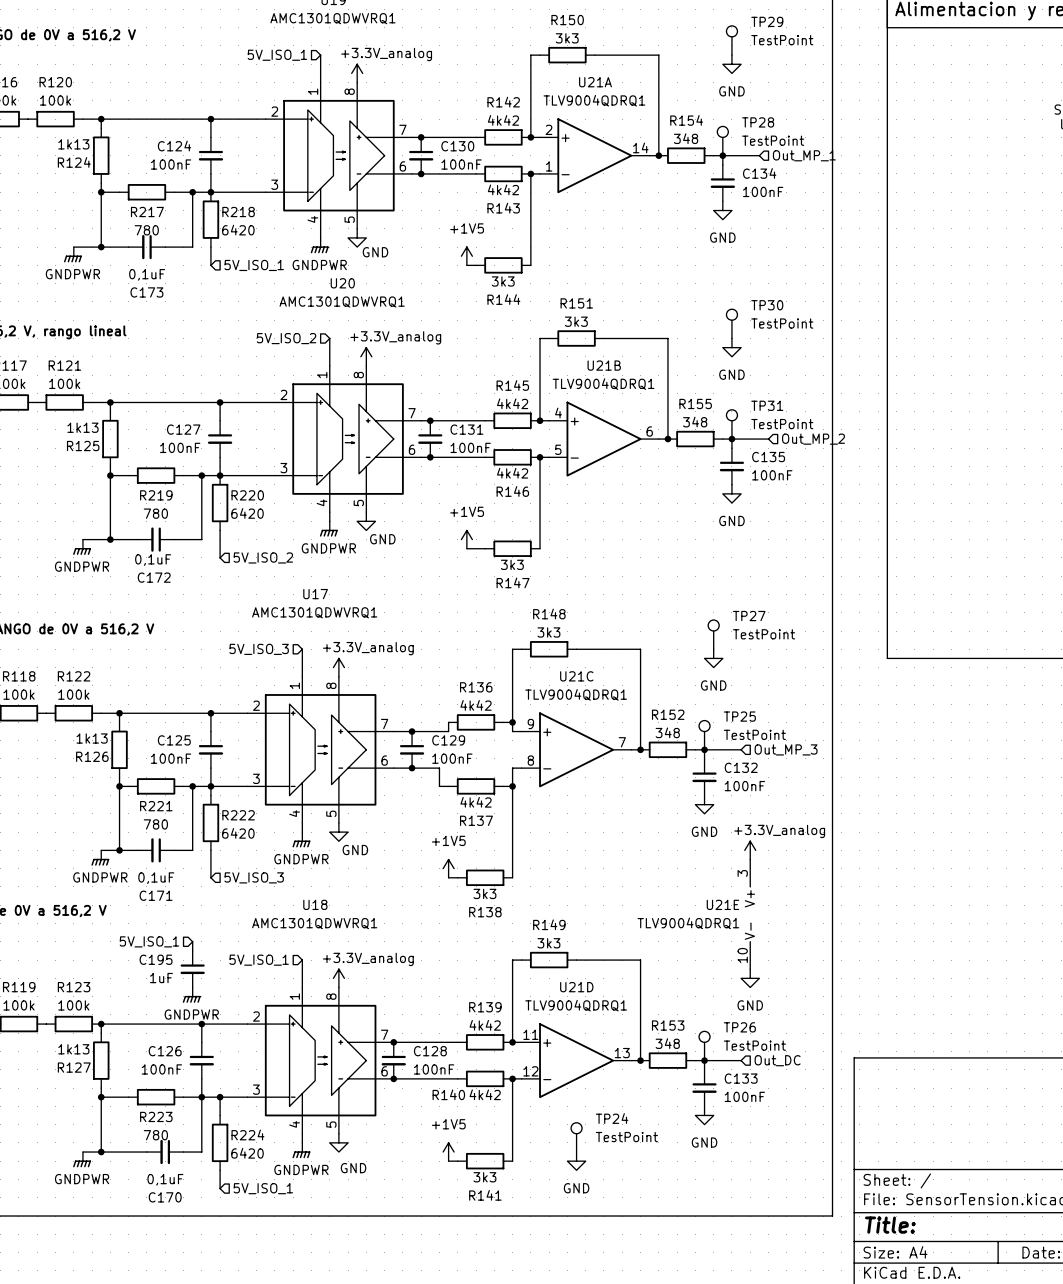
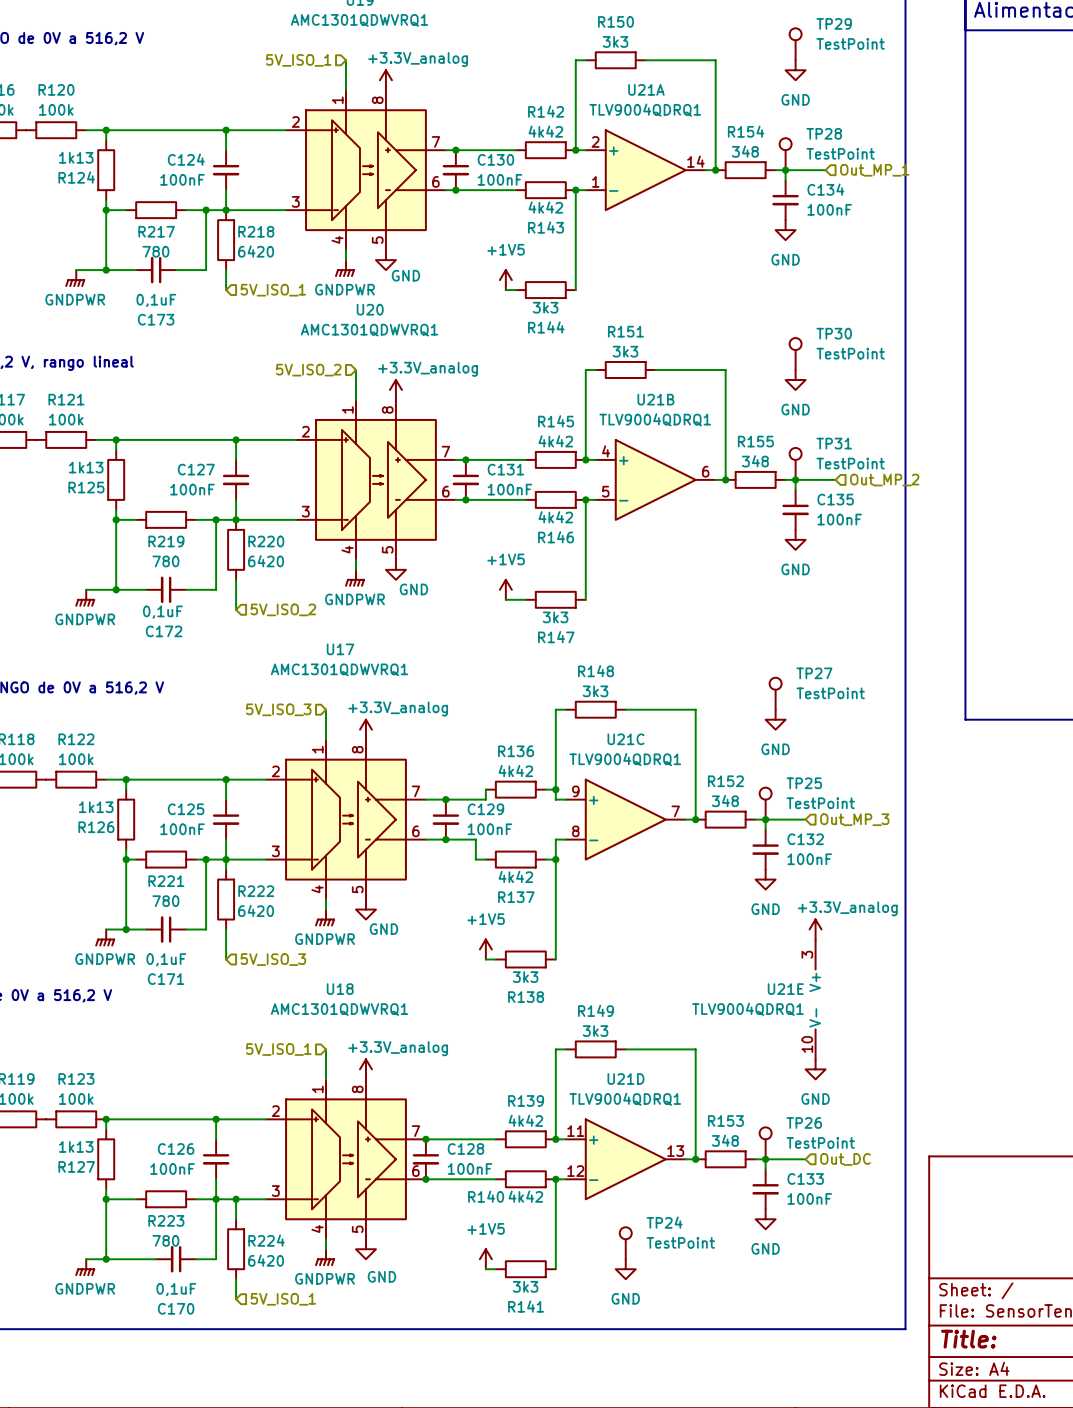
hierarchical label: 5V_ISO_1 (149, 941) -> none
wire: (192, 941) (192, 950) -> none
C195: 1uF (192, 969) -> none
power symbol: GNDPWR (191, 995) -> none

